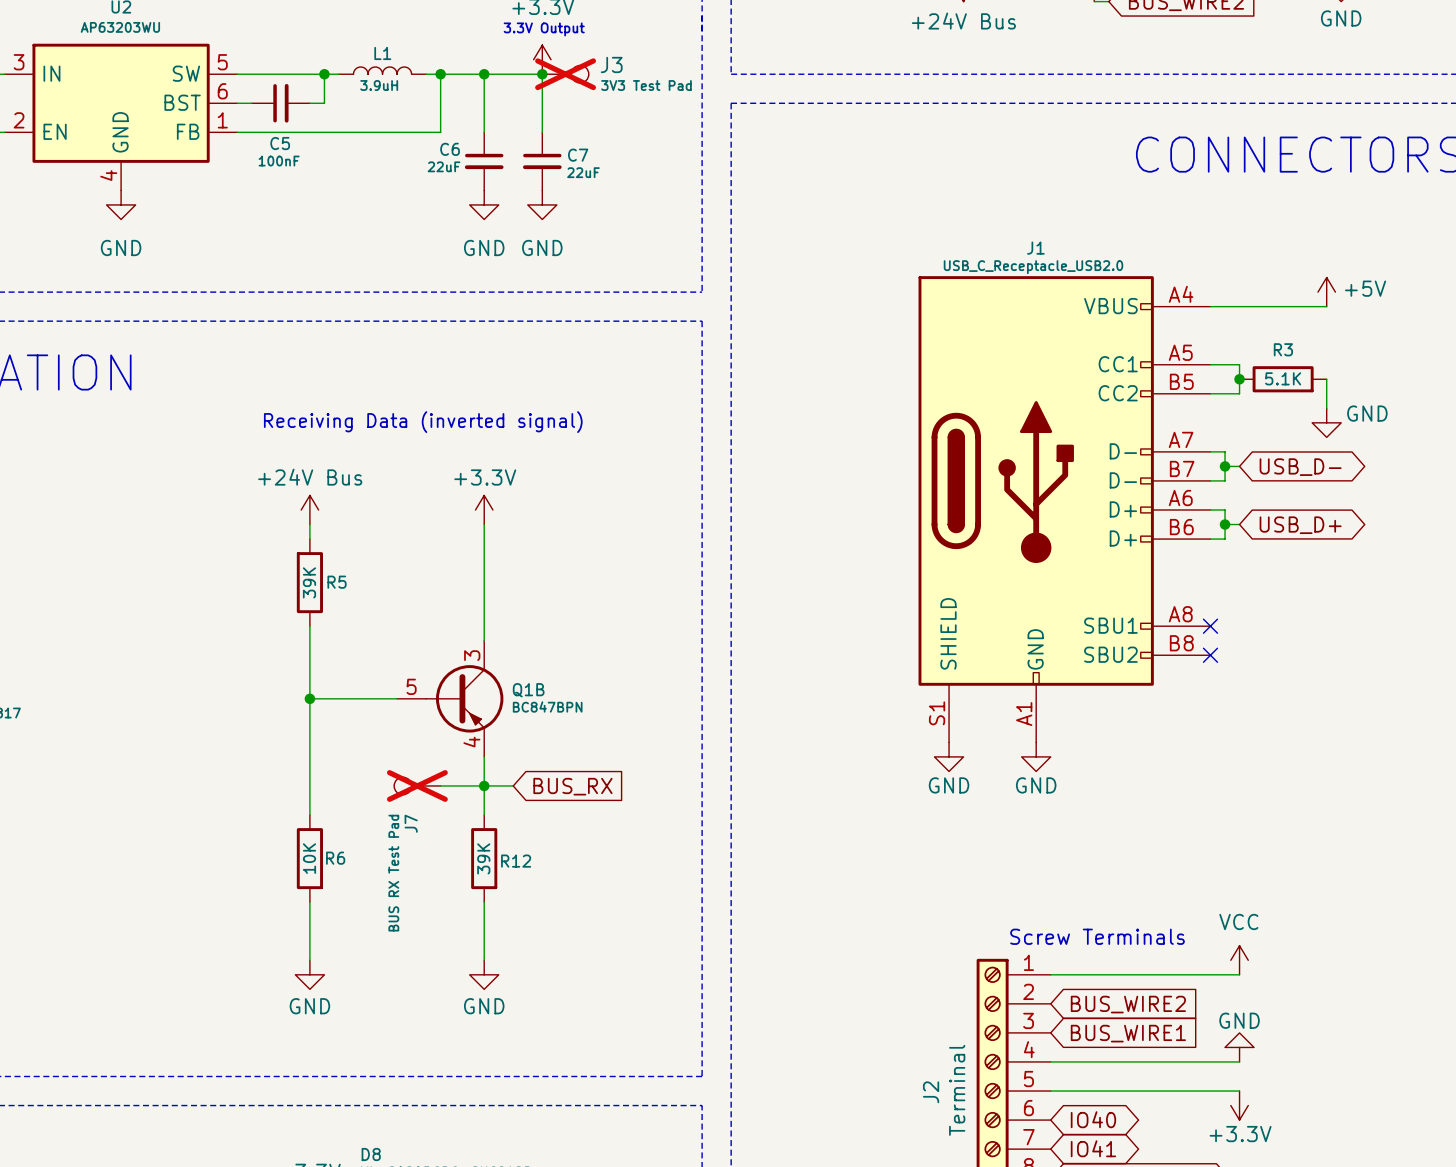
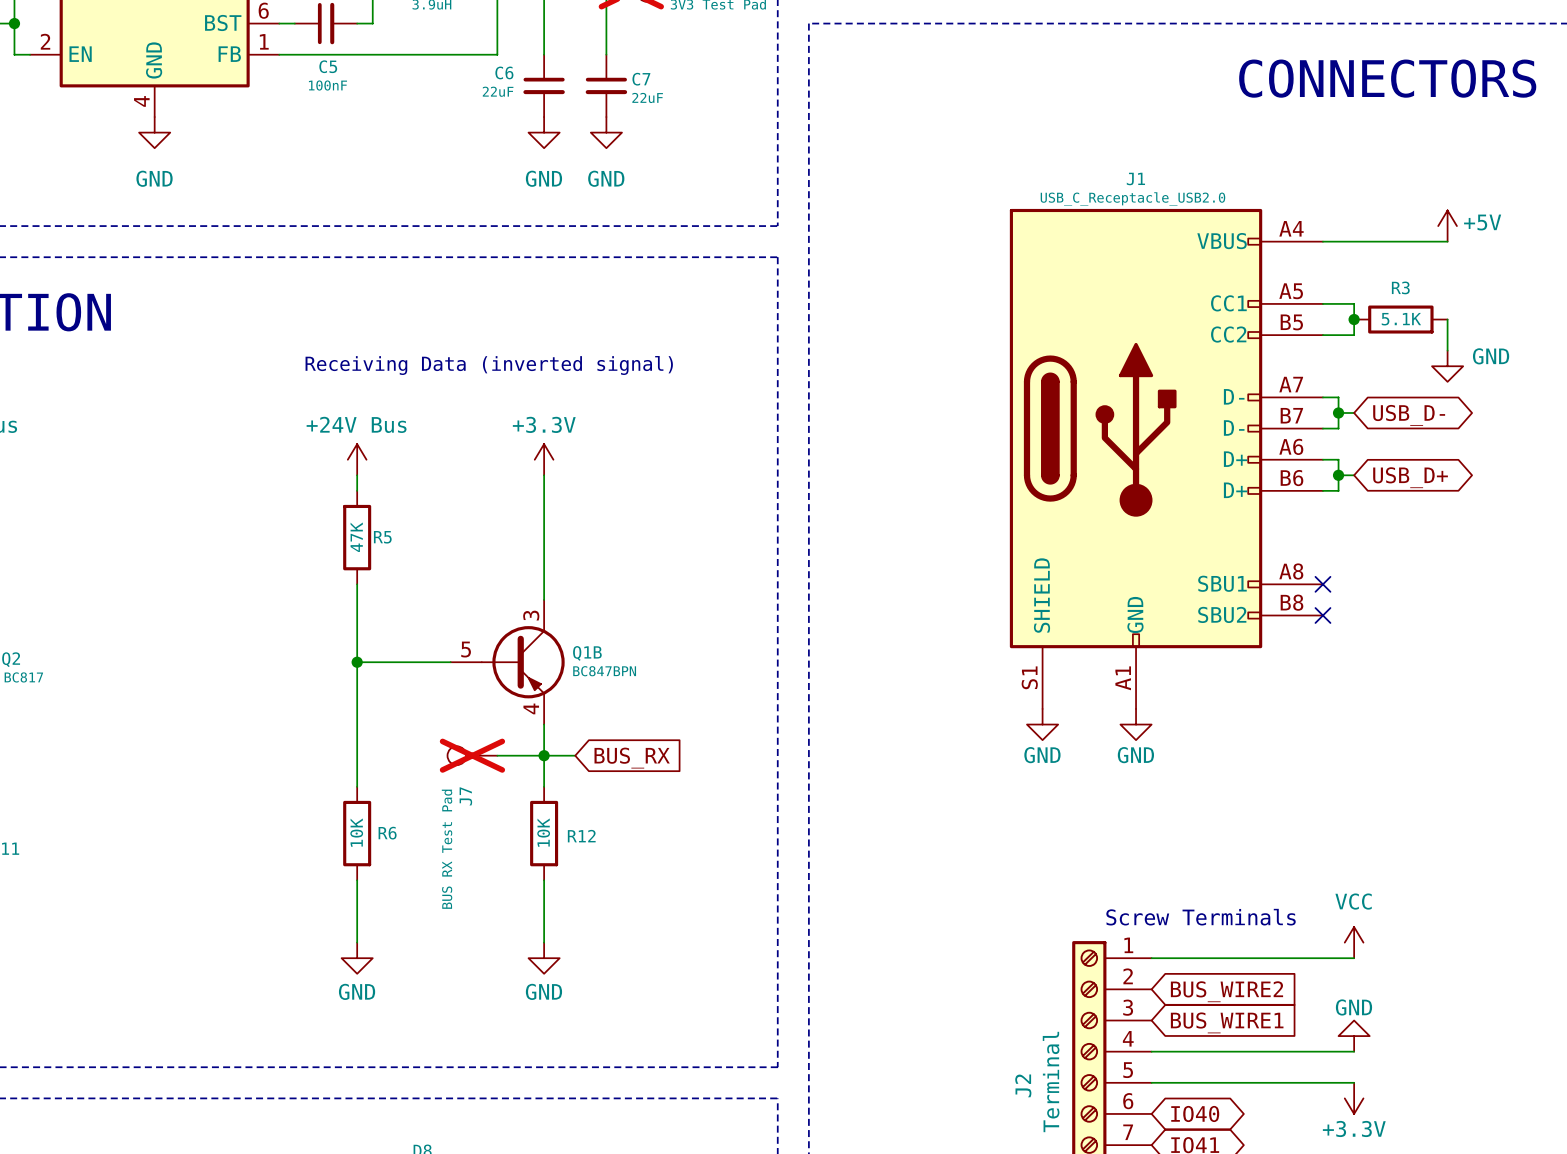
R5 value: 39K (309, 582) -> 47K (356, 537)
R12 value: 39K (483, 858) -> 10K (543, 832)

